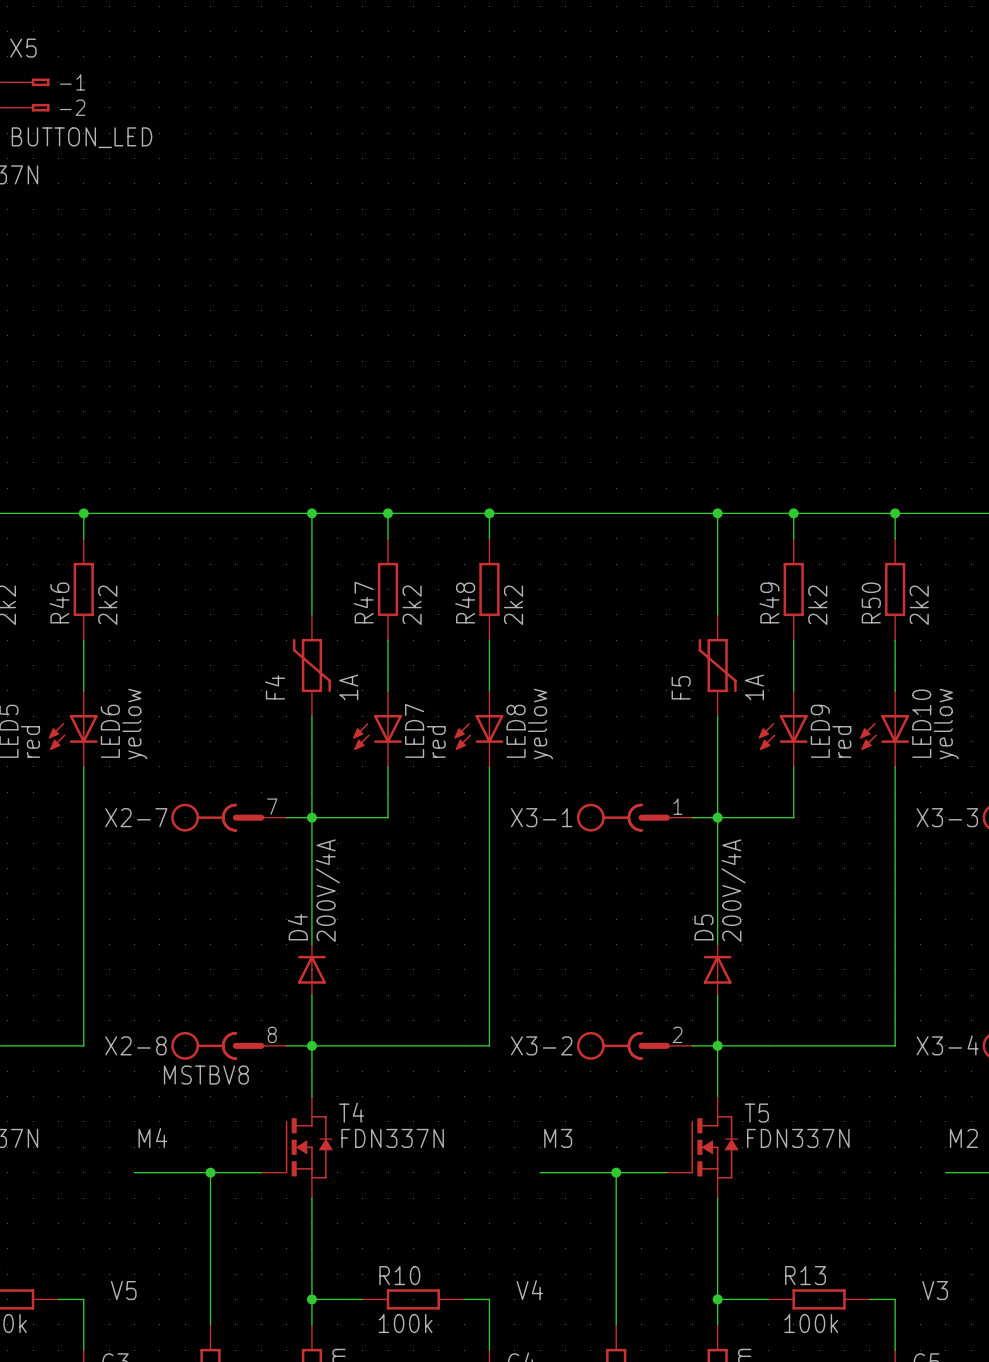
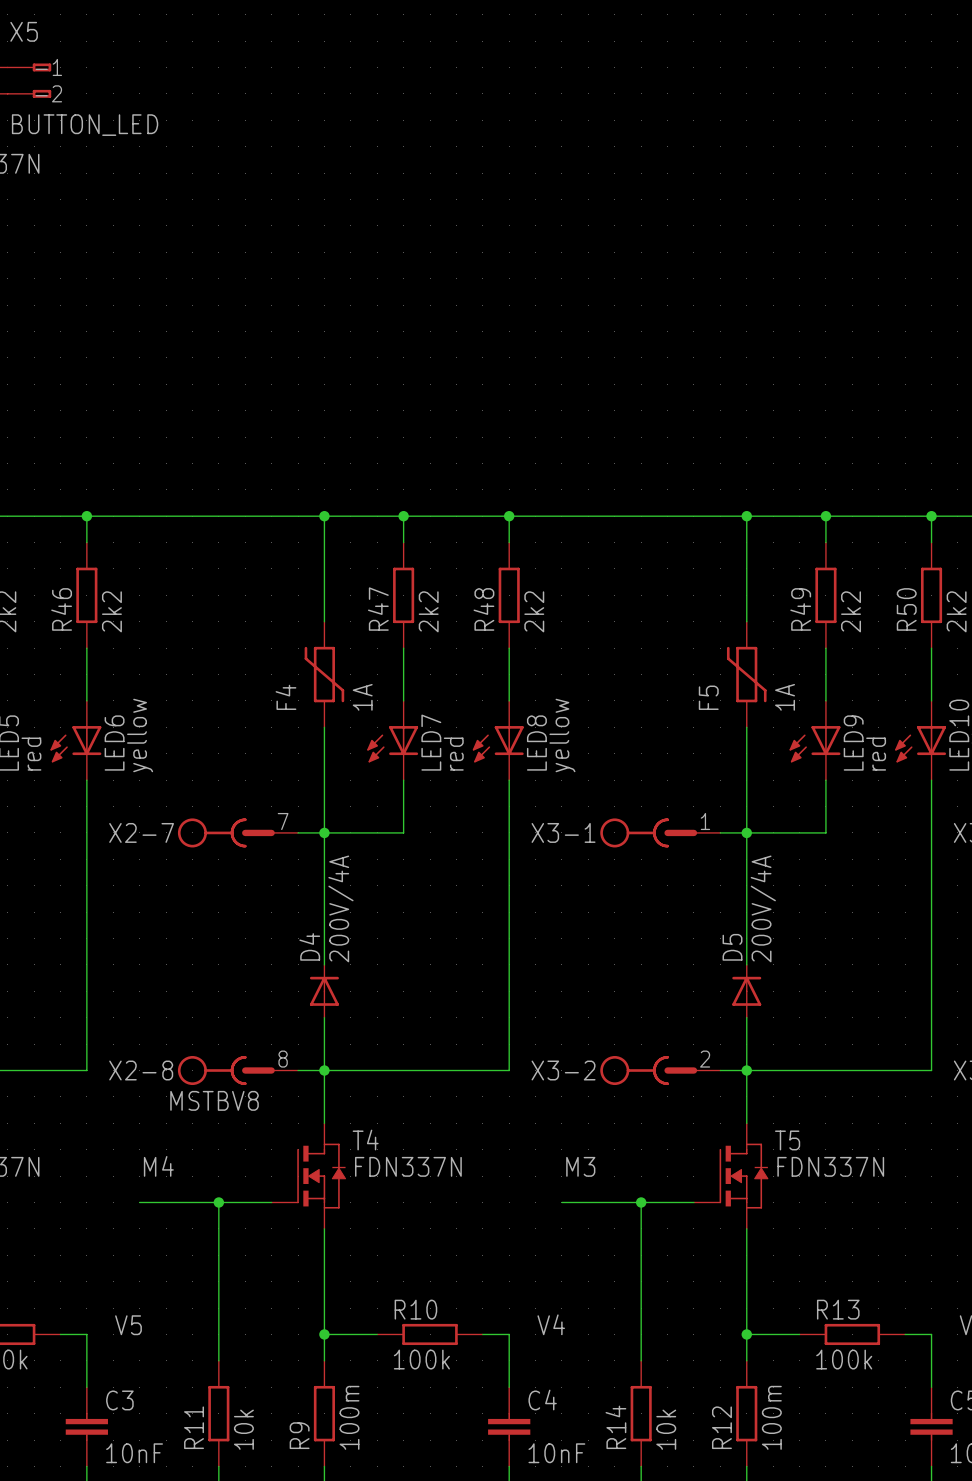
X5 pin name: none -> -1 (48, 67)
X5 pin name: -1 (72, 82) -> none
X5 pin name: none -> -2 (48, 93)
X5 pin name: -2 (72, 107) -> none

